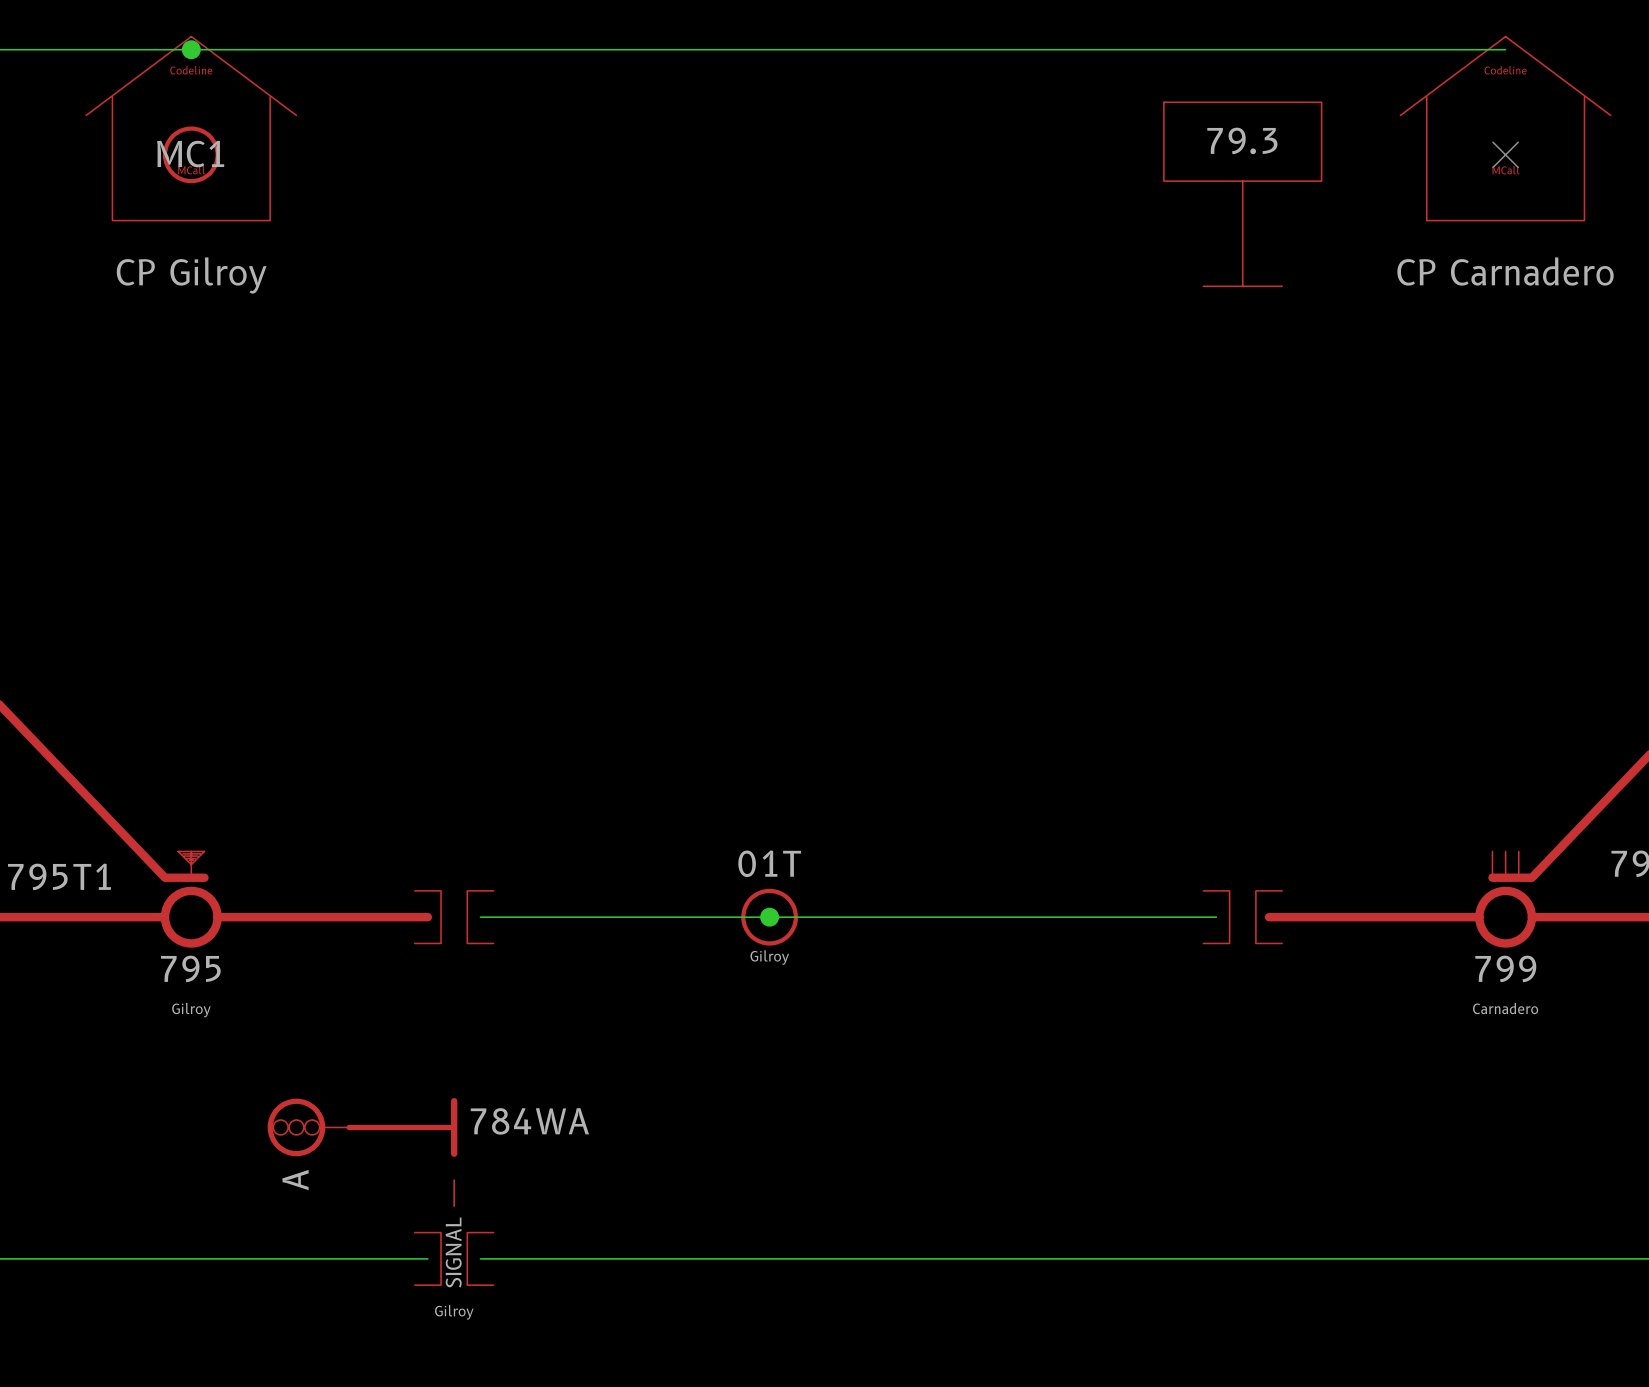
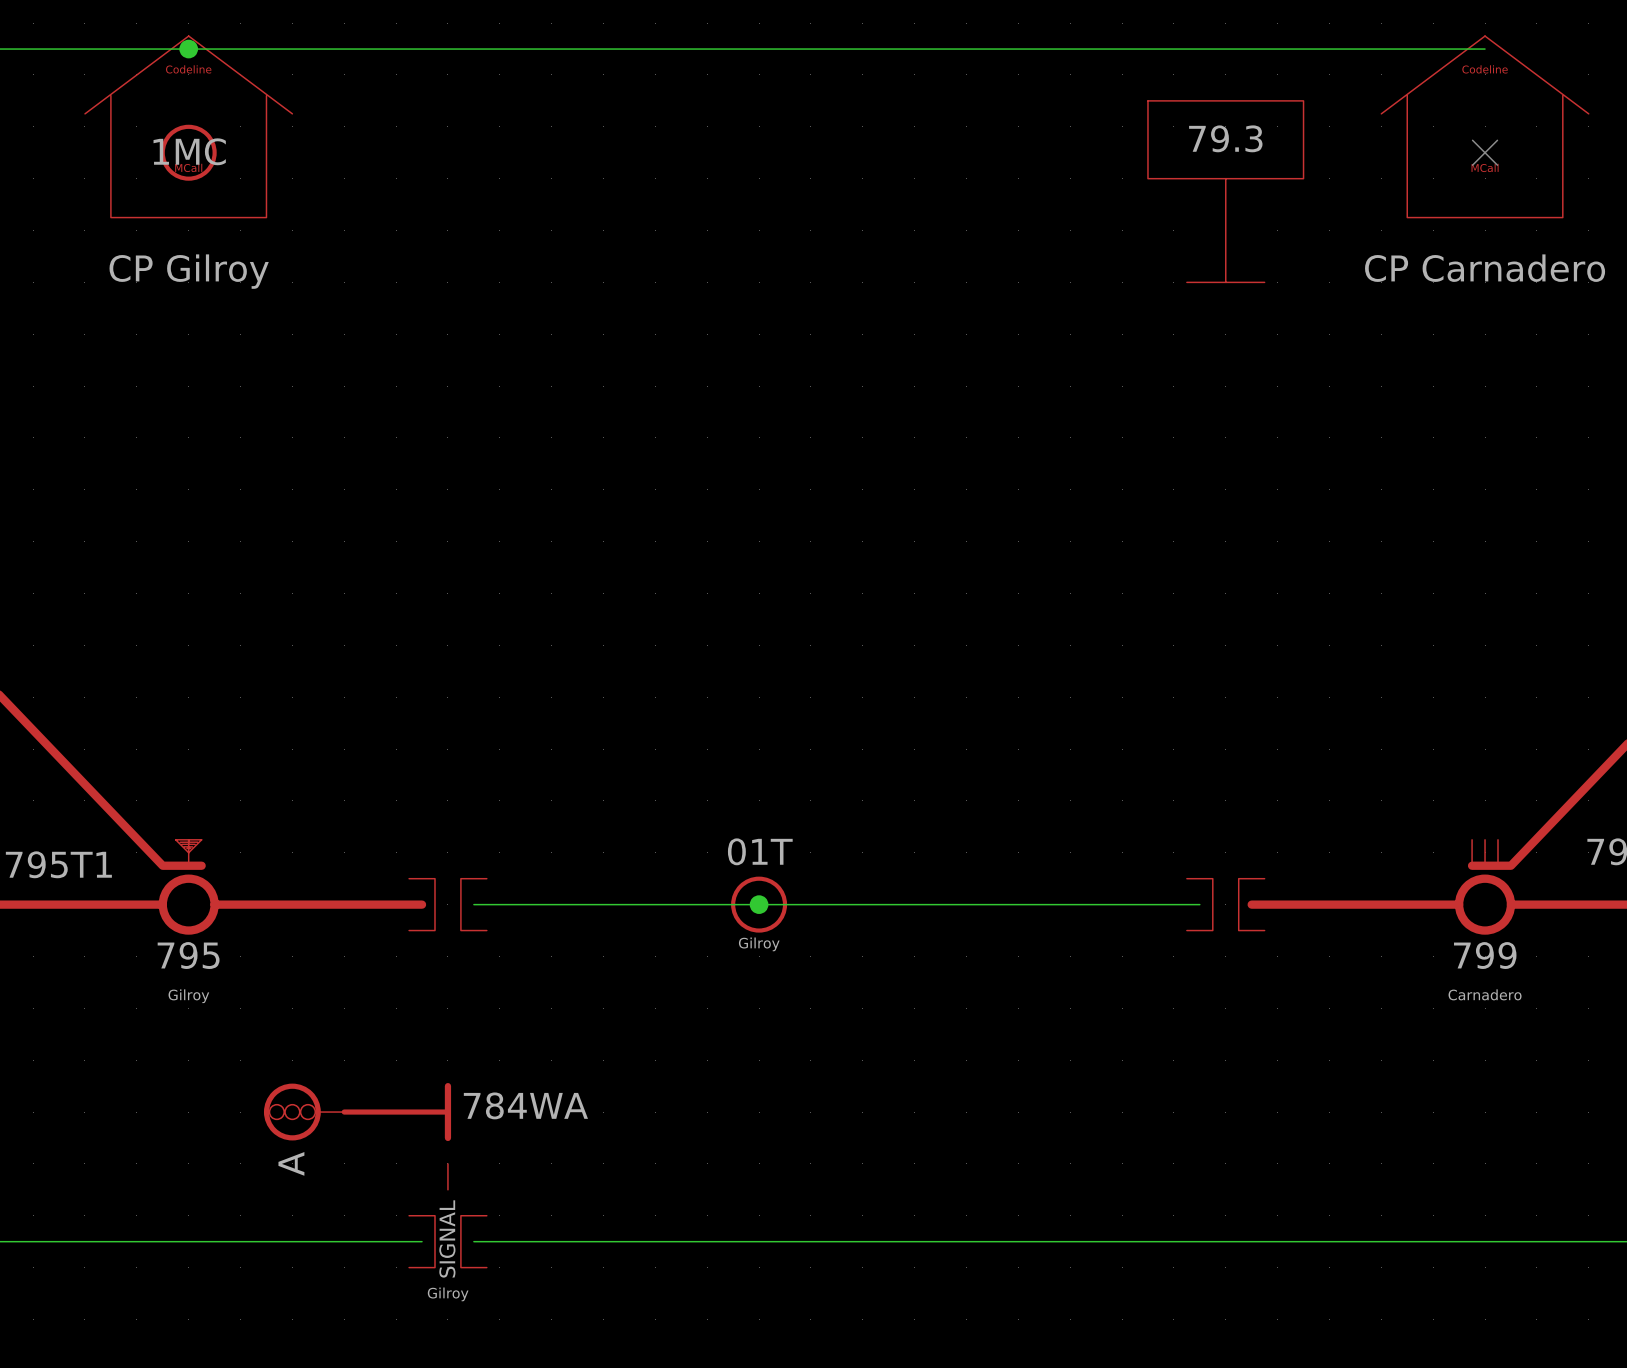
part value: MC1 (190, 154) -> none
part text: none -> 1MC (189, 151)

